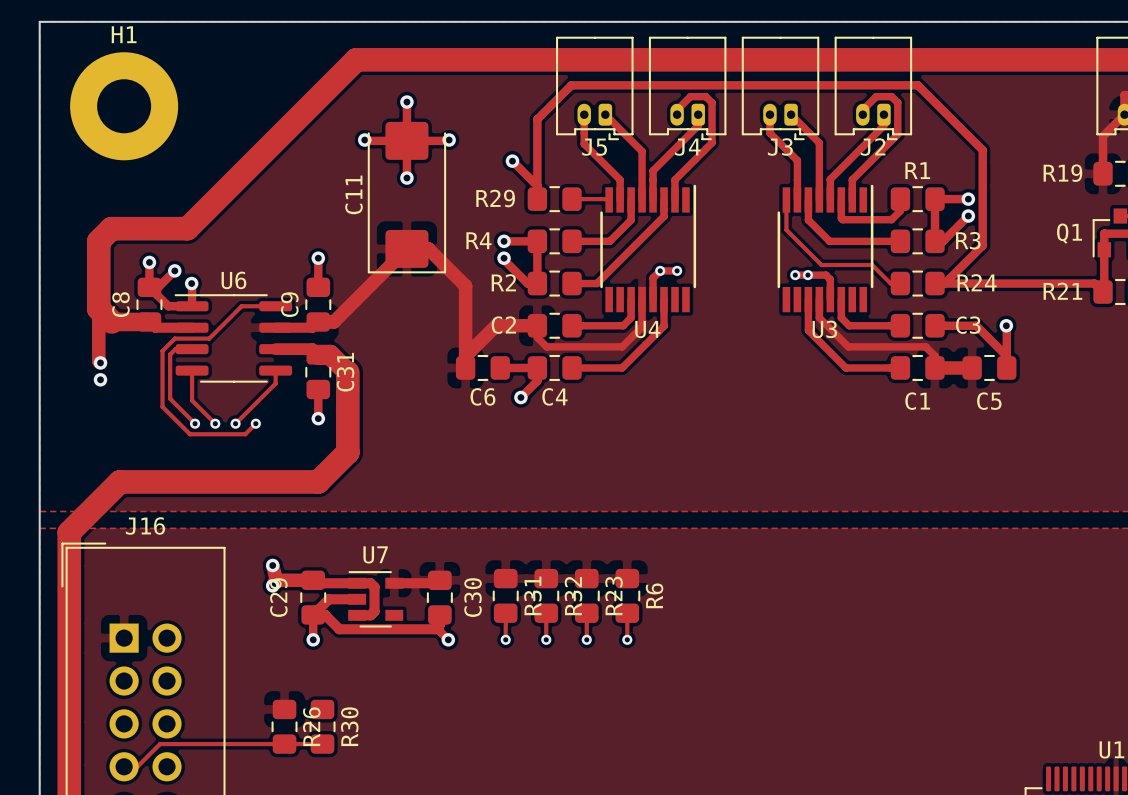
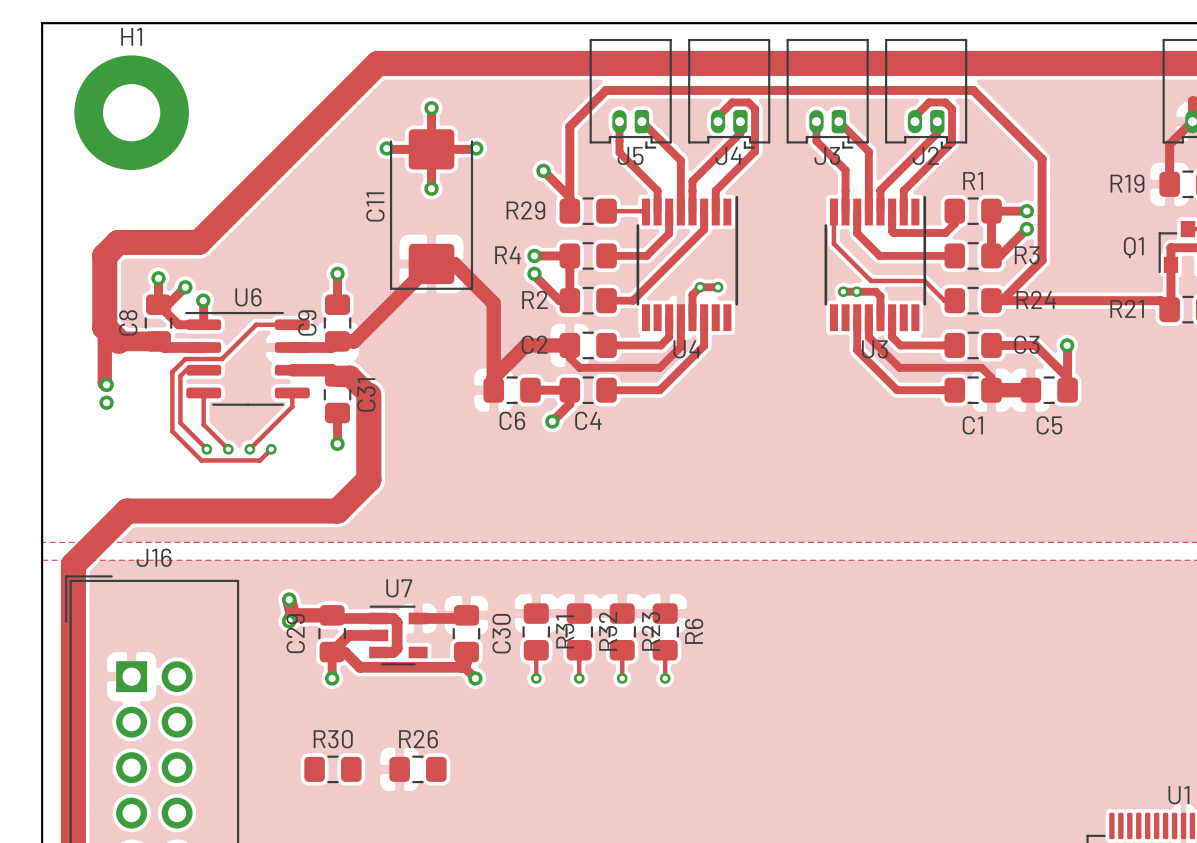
R26 rotation: 0° (284, 726) -> 90° clockwise (417, 769)
R26 position: (284, 726) -> (417, 769)
R26 name position: R26 (311, 726) -> R26 (418, 739)
R30 rotation: 0° (322, 726) -> 90° clockwise (332, 769)
R30 name position: R30 (349, 726) -> R30 (333, 739)
track: (322, 744) (160, 744) (137, 766) (124, 766) -> none

